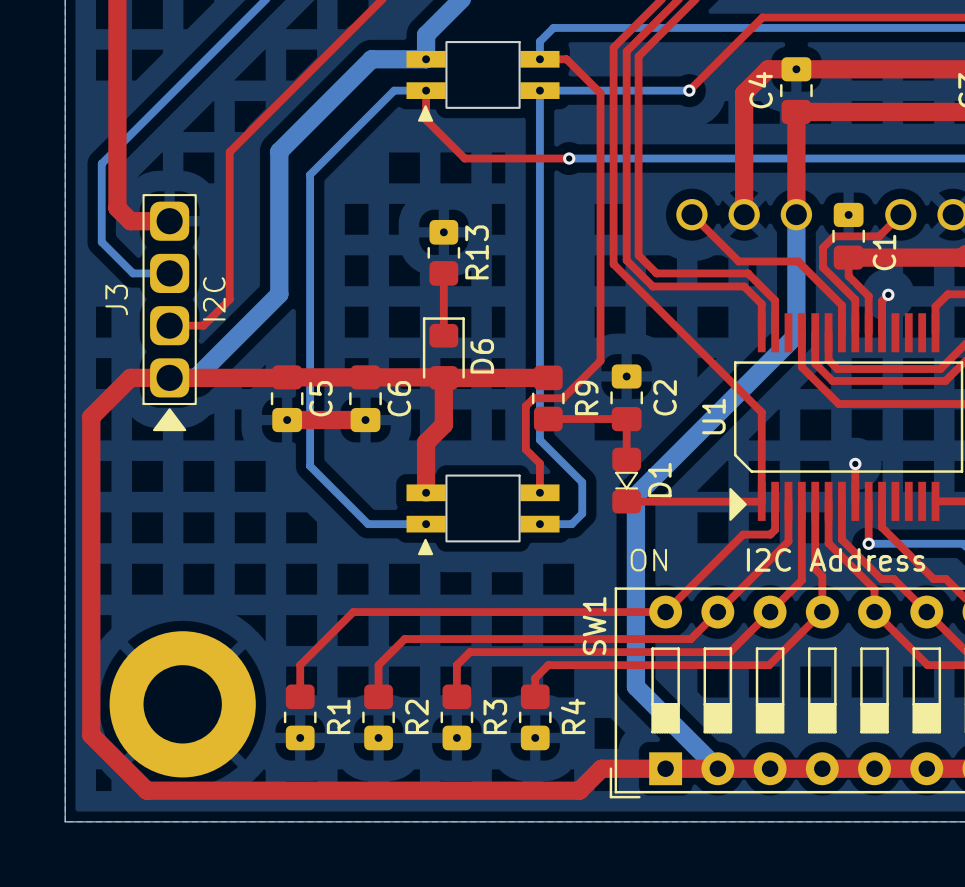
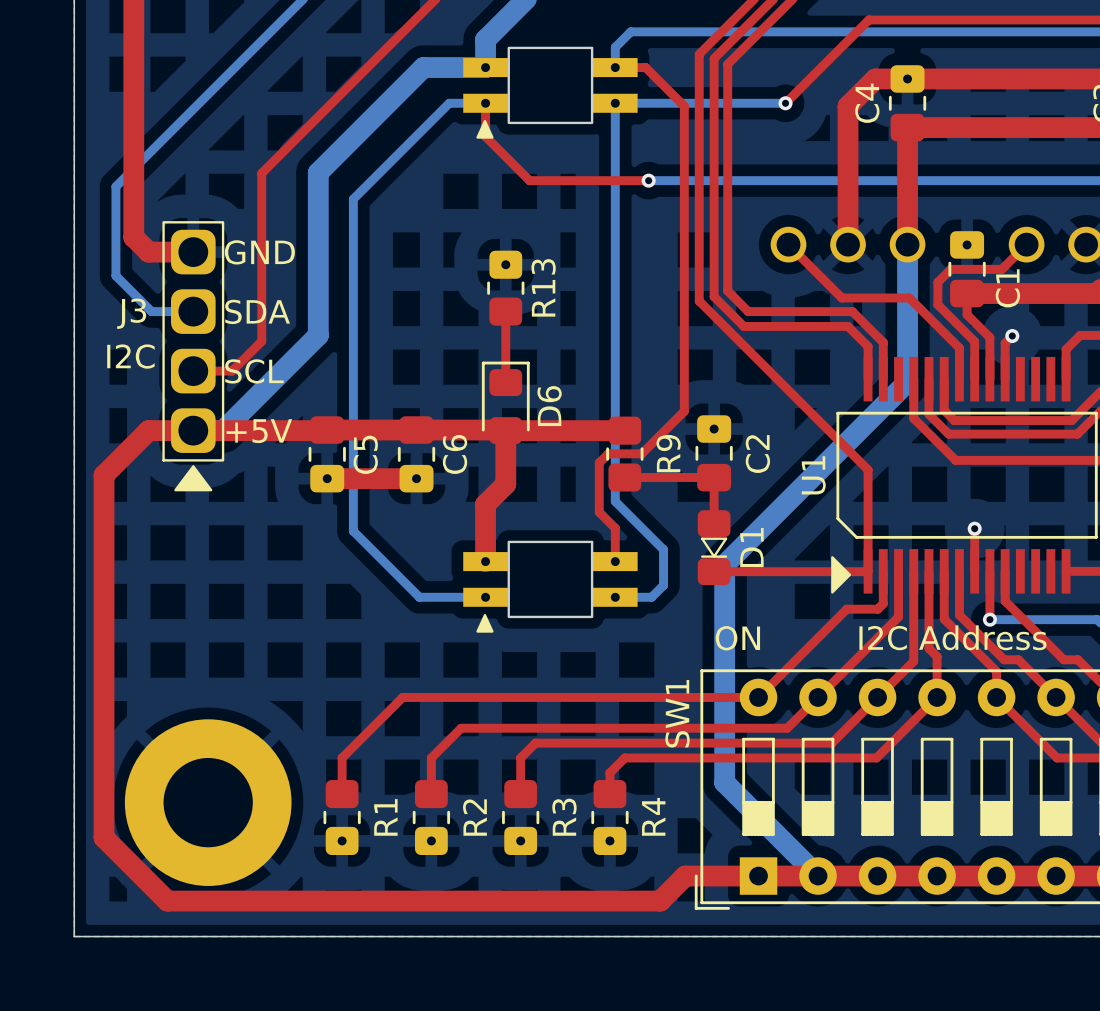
text: none -> GND (259, 252)
text: none -> SDA (257, 311)
text rotation: 0° (214, 298) -> 90° clockwise (130, 356)
text position: I2C (214, 298) -> I2C (130, 356)
J3 name rotation: 0° (116, 300) -> 90° clockwise (131, 313)
text: none -> SCL (254, 371)
text: none -> +5V (259, 431)

